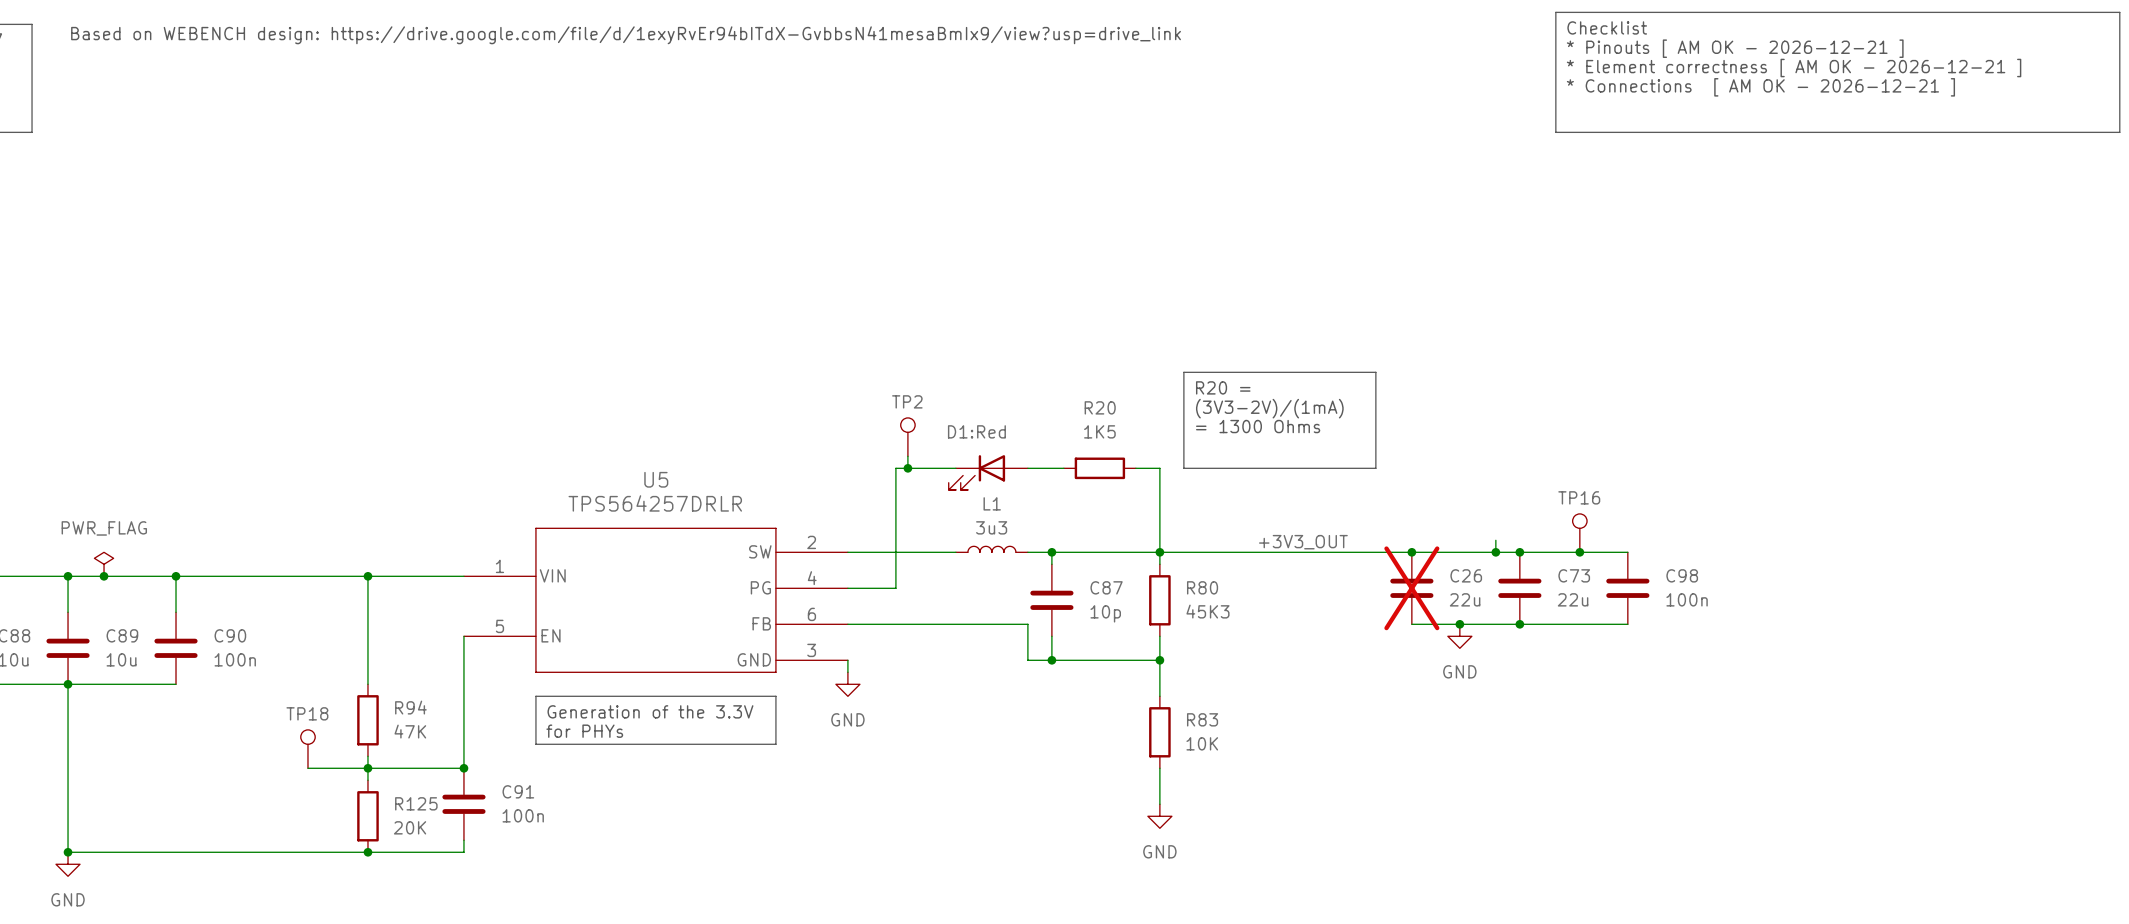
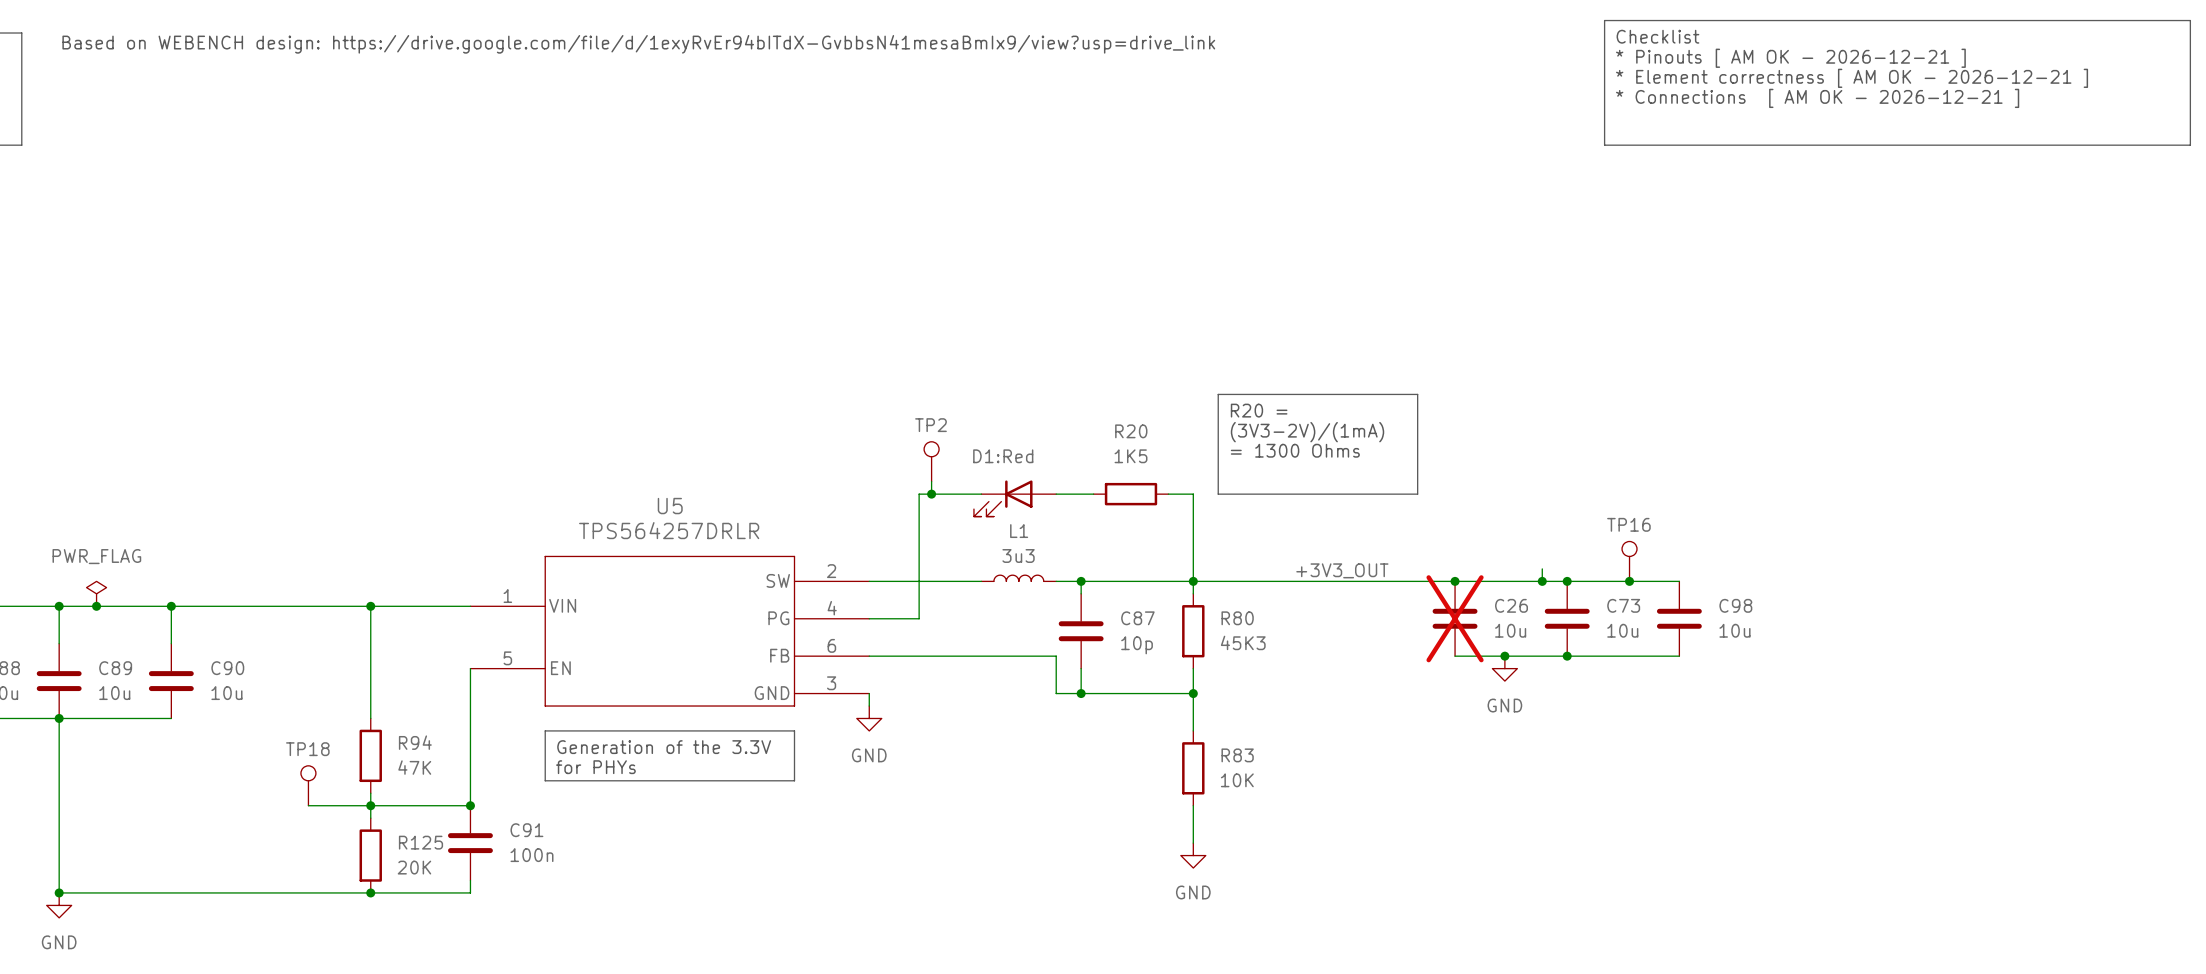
C26 value: 22u (1465, 599) -> 10u (1510, 630)
C73 value: 22u (1573, 599) -> 10u (1622, 630)
C98 value: 100n (1687, 599) -> 10u (1734, 630)
C90 value: 100n (235, 659) -> 10u (226, 693)

